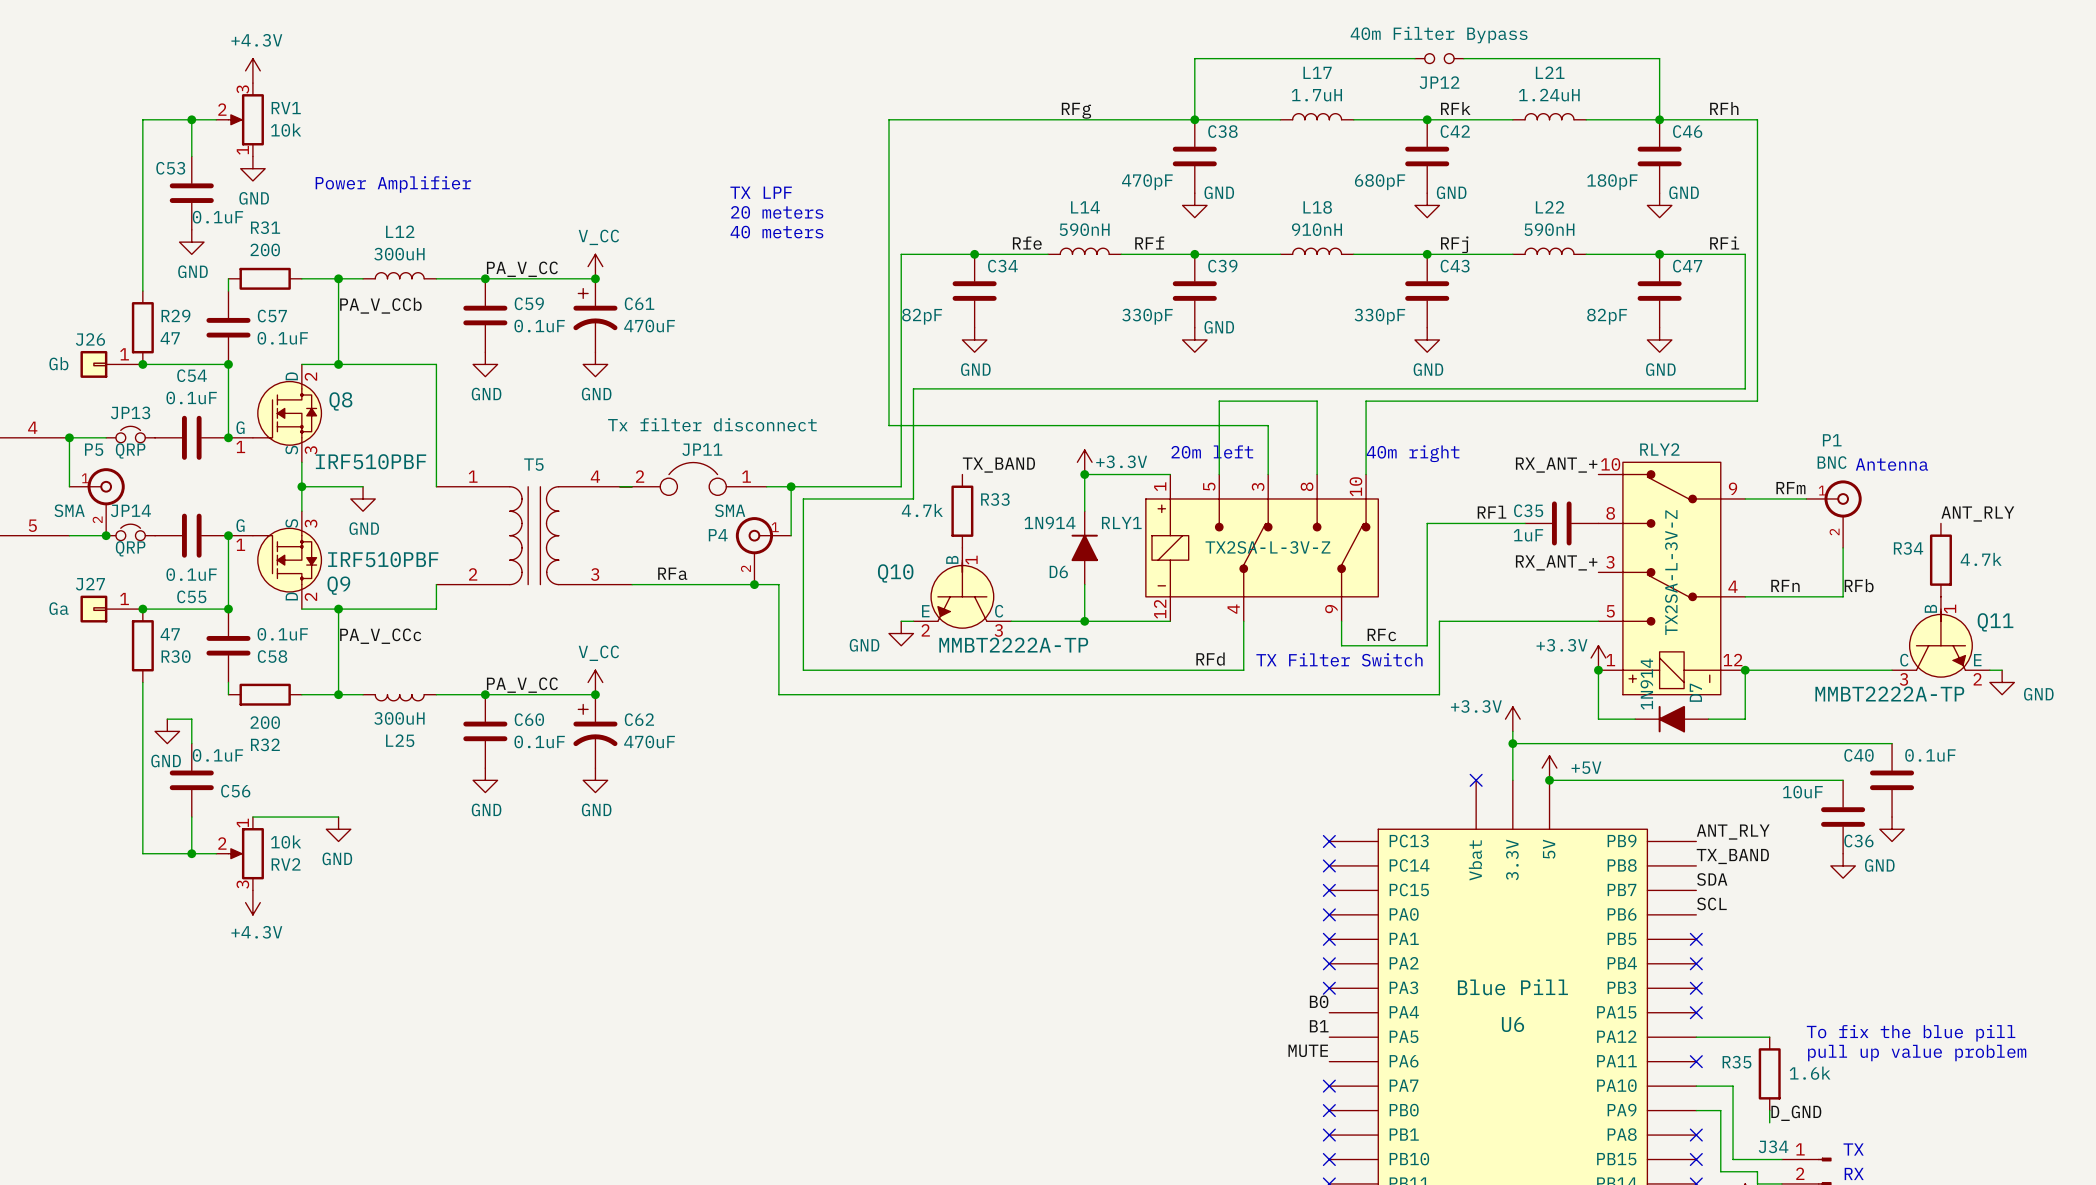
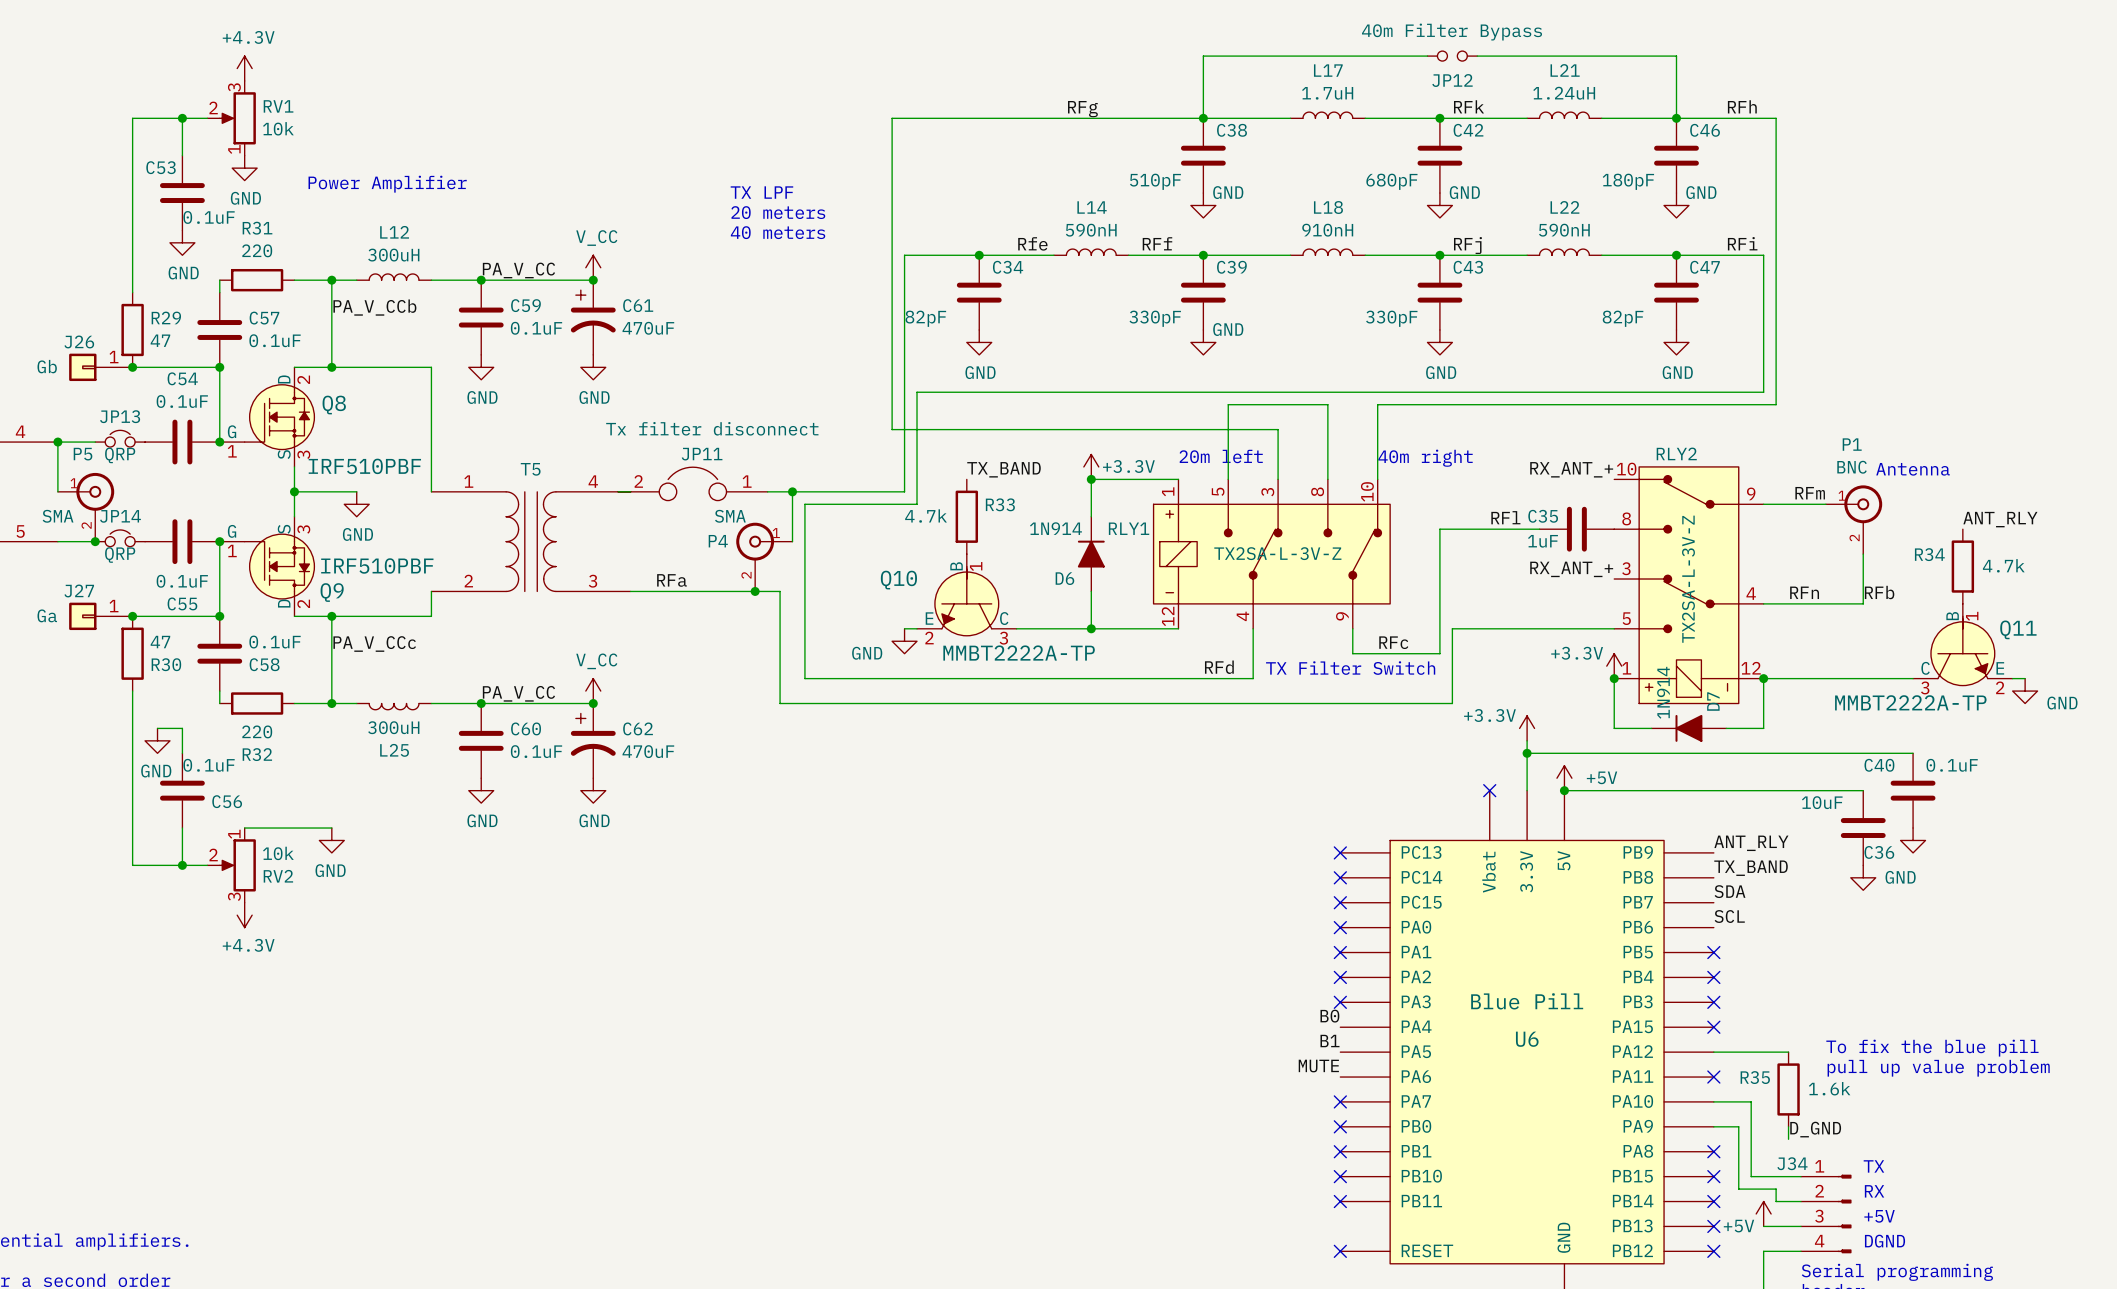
C38 value: 470pF (1147, 182) -> 510pF (1155, 181)
R31 value: 200 (265, 249) -> 220 (257, 250)
R32 value: 200 (265, 722) -> 220 (257, 731)

